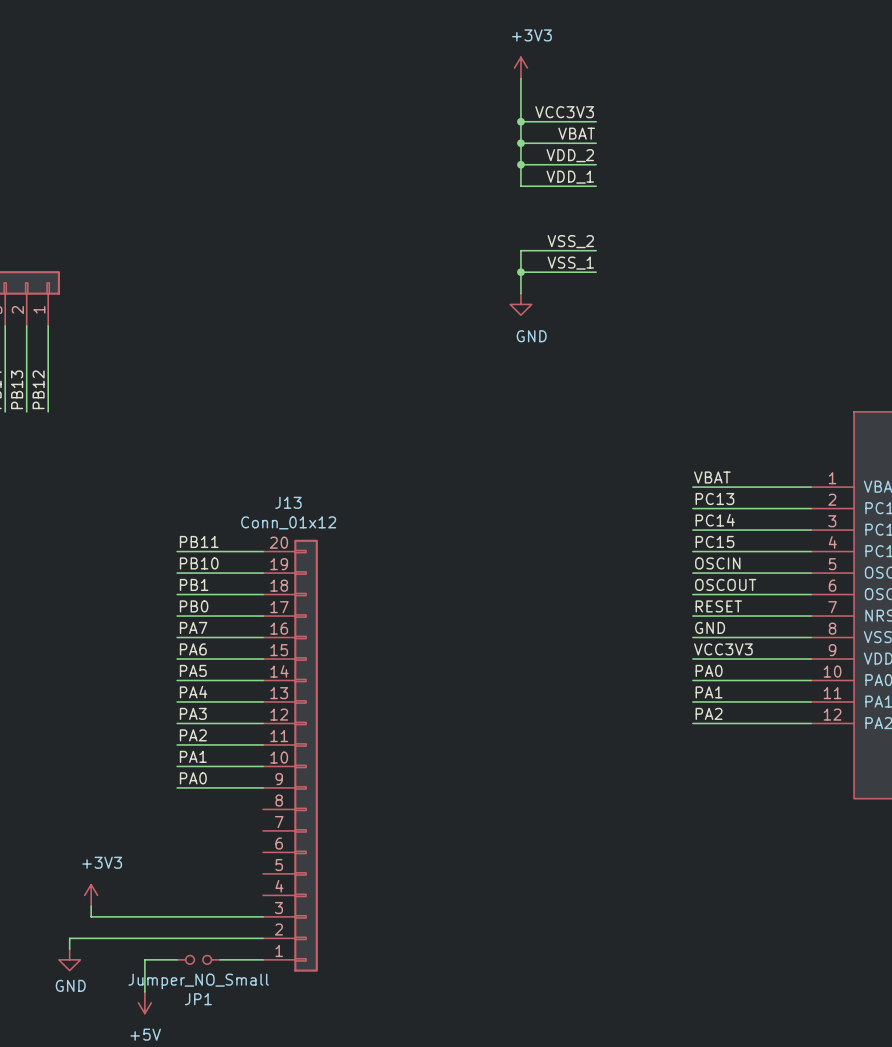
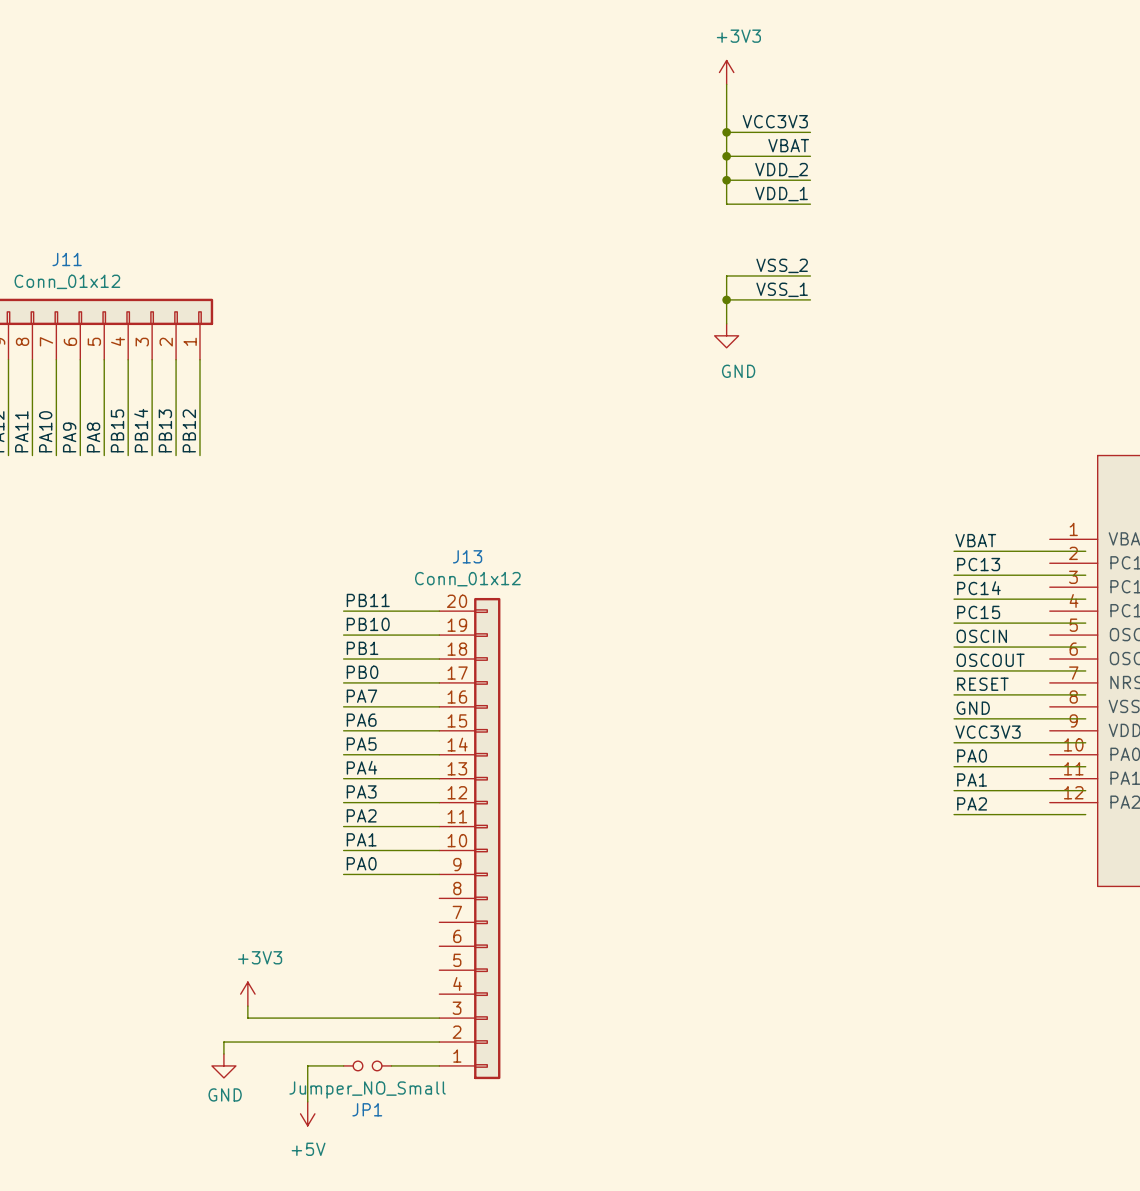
label position: VBAT (712, 477) -> VBAT (975, 540)
wire: (692, 487) (811, 487) -> (954, 551) (1085, 551)
label position: PC13 (714, 498) -> PC13 (978, 564)
wire: (692, 508) (811, 508) -> (954, 575) (1085, 575)
label position: PC14 (715, 520) -> PC14 (978, 588)
wire: (692, 530) (811, 530) -> (954, 599) (1085, 599)
label position: PC15 (714, 541) -> PC15 (978, 612)
wire: (692, 551) (811, 551) -> (954, 623) (1085, 623)
label position: OSCIN (717, 563) -> OSCIN (981, 636)
wire: (692, 573) (811, 573) -> (954, 647) (1085, 647)
label position: OSCOUT (725, 584) -> OSCOUT (990, 660)
wire: (692, 594) (811, 594) -> (954, 670) (1085, 670)
label position: RESET (718, 606) -> RESET (982, 684)
wire: (692, 616) (811, 616) -> (954, 694) (1085, 694)
label position: GND (710, 627) -> GND (973, 708)
wire: (692, 637) (811, 637) -> (954, 718) (1085, 718)
label position: VCC3V3 (723, 649) -> VCC3V3 (988, 732)
wire: (692, 659) (811, 659) -> (954, 742) (1085, 742)
label position: PA0 (709, 670) -> PA0 (972, 756)
wire: (692, 680) (811, 680) -> (954, 766) (1085, 766)
label position: PA1 (709, 692) -> PA1 (972, 779)
wire: (692, 701) (811, 701) -> (954, 790) (1085, 790)
label position: PA2 (709, 713) -> PA2 (972, 803)
wire: (692, 723) (811, 723) -> (954, 814) (1085, 814)

